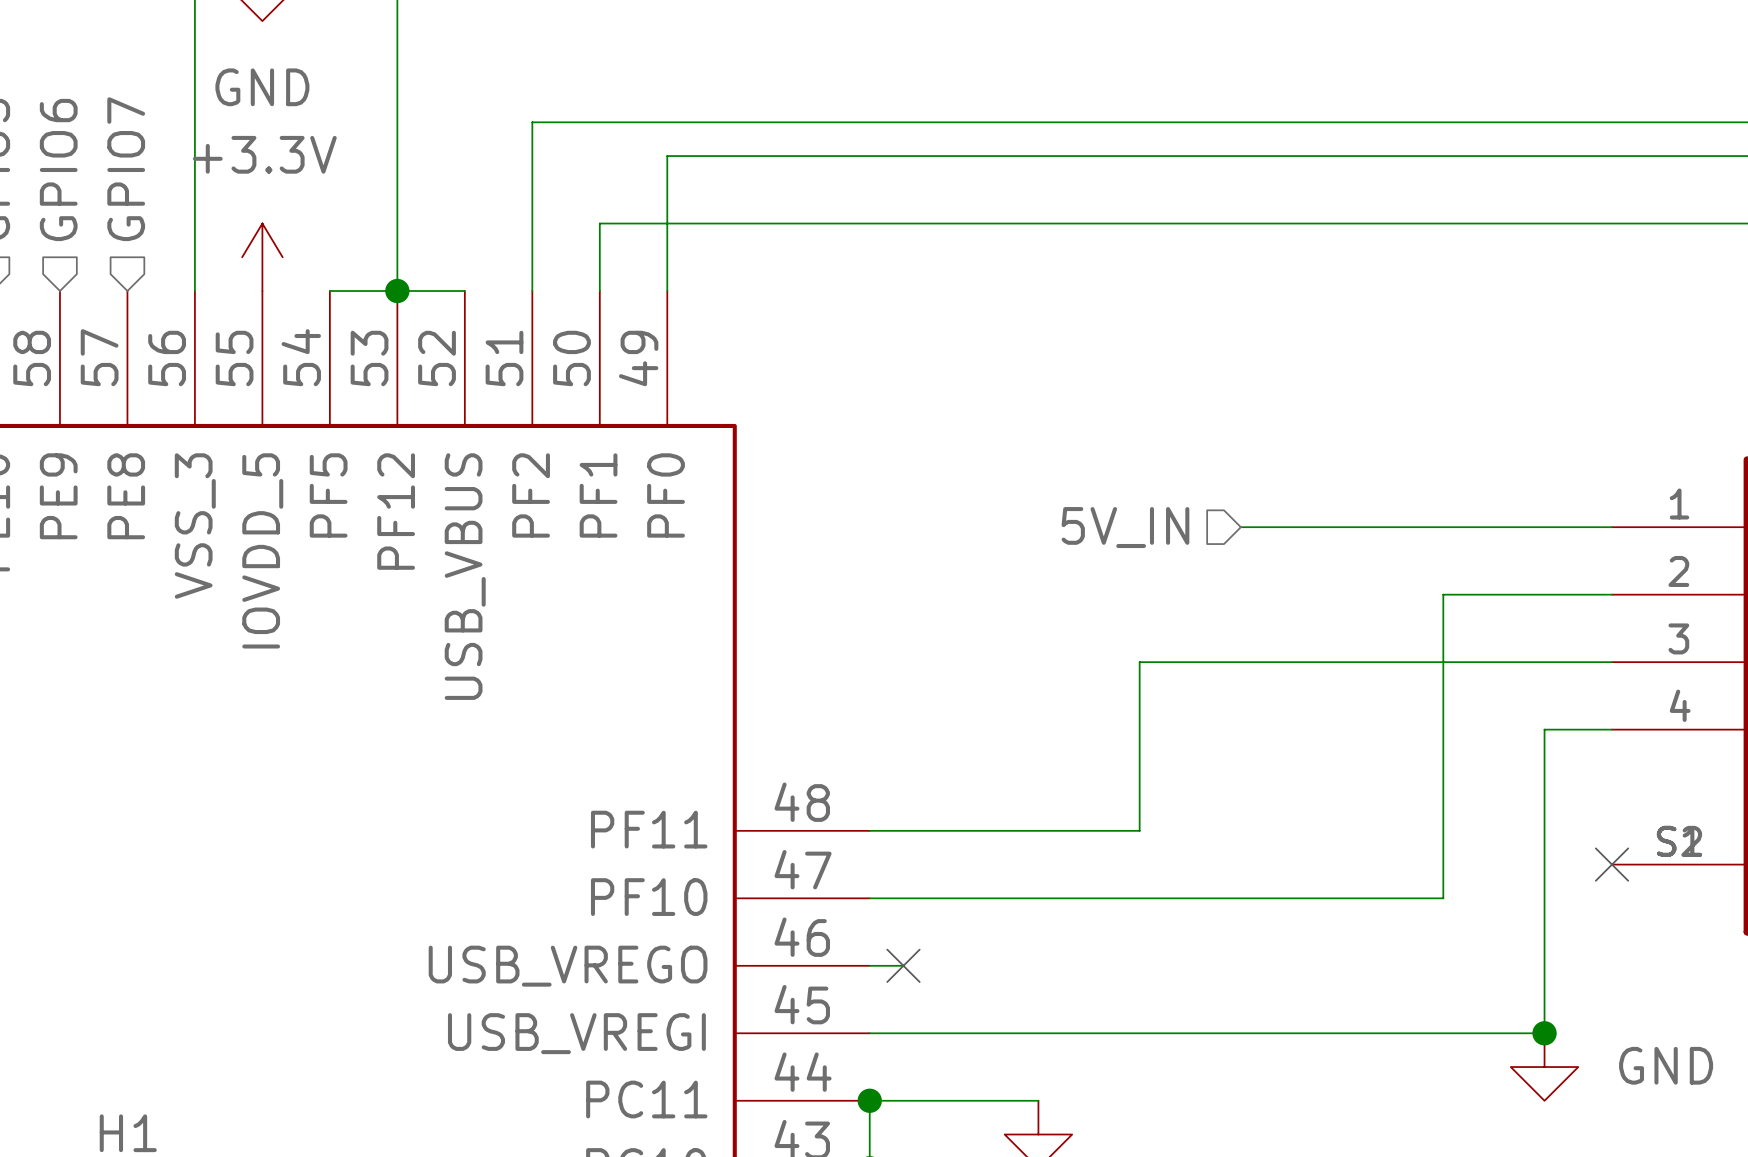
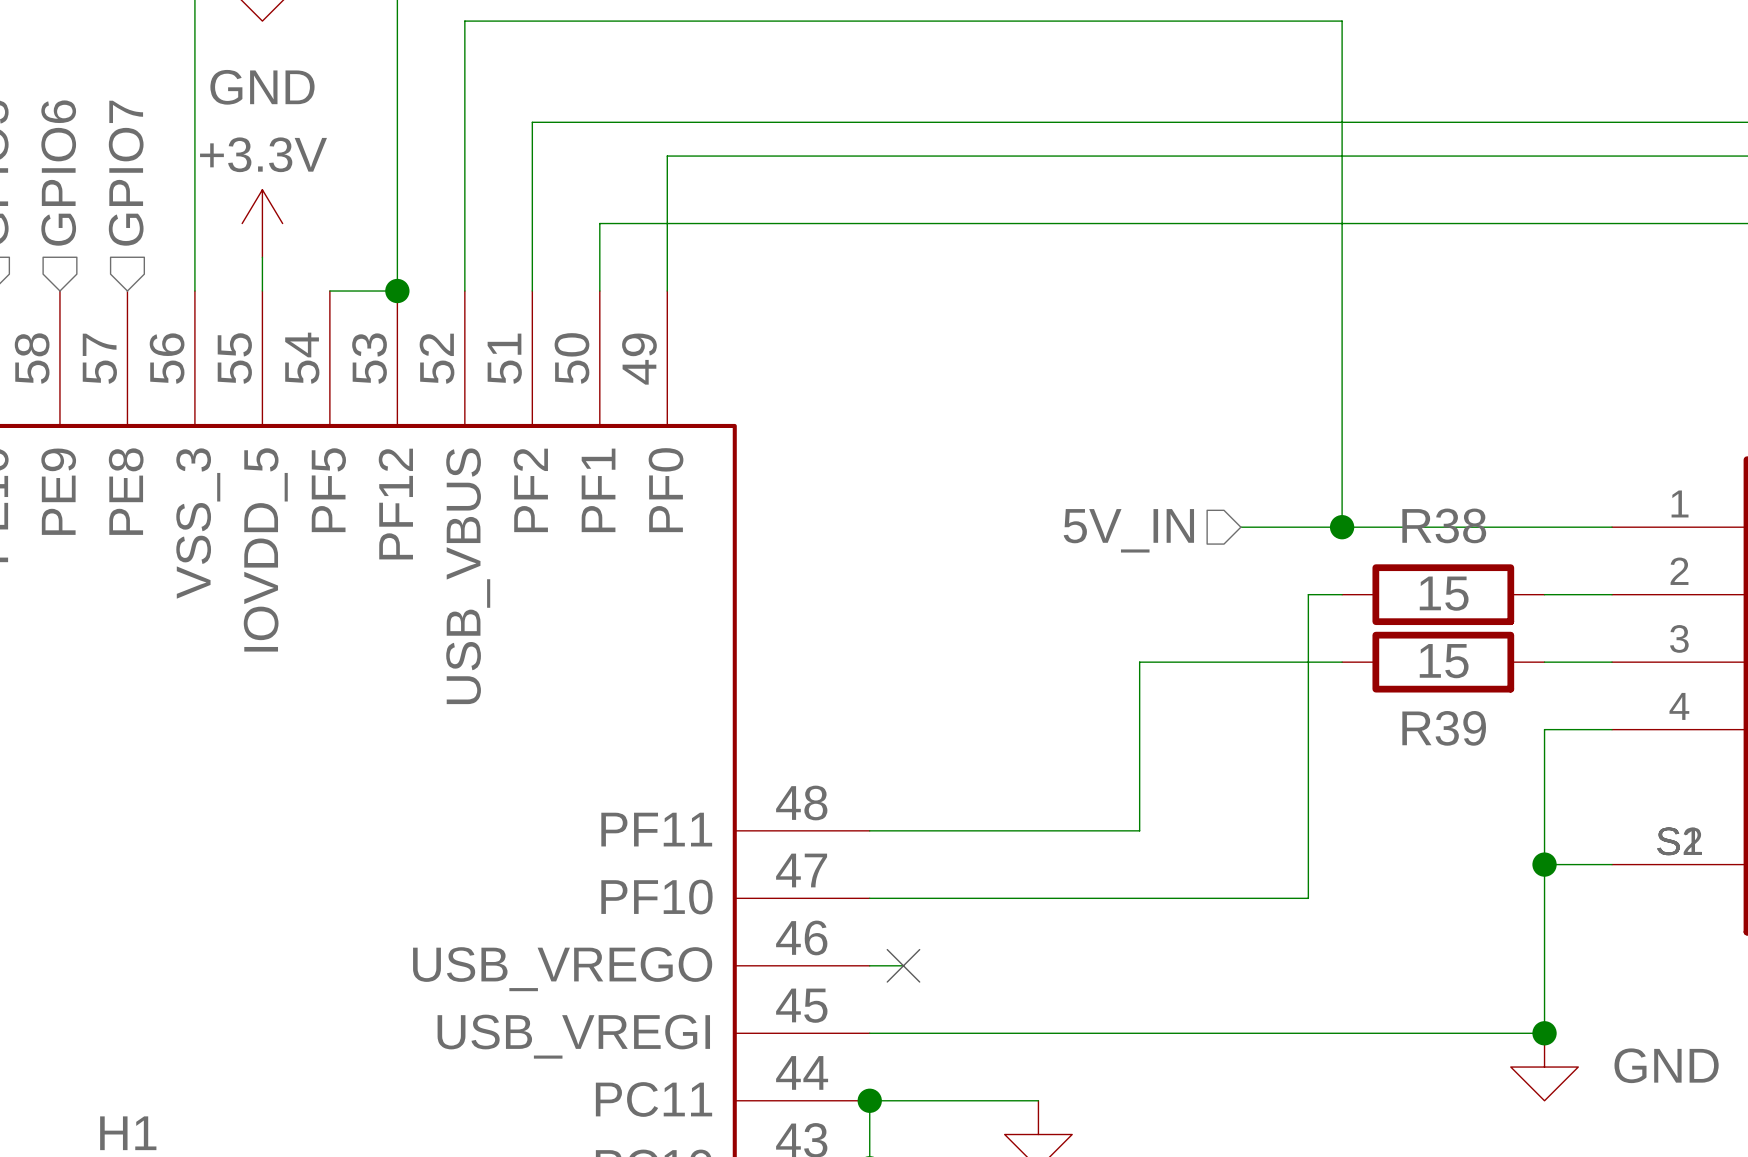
power symbol position: +3.3V (262, 257) -> +3.3V (262, 223)
wire: (397, 291) (464, 291) -> (1342, 527) (1342, 21) (464, 21) (464, 291)
junction: none -> (1342, 527)
R38: none -> 15 (1443, 594)
wire: (1544, 594) (1443, 594) (1443, 898) (1308, 898) -> (1342, 594) (1308, 594) (1308, 898)
wire: (1342, 662) (1544, 662) -> none
R39: none -> 15 (1443, 662)
wire: none -> (1544, 864) (1612, 864)
junction: none -> (1544, 864)
no-connect mark: (1612, 864) -> none

